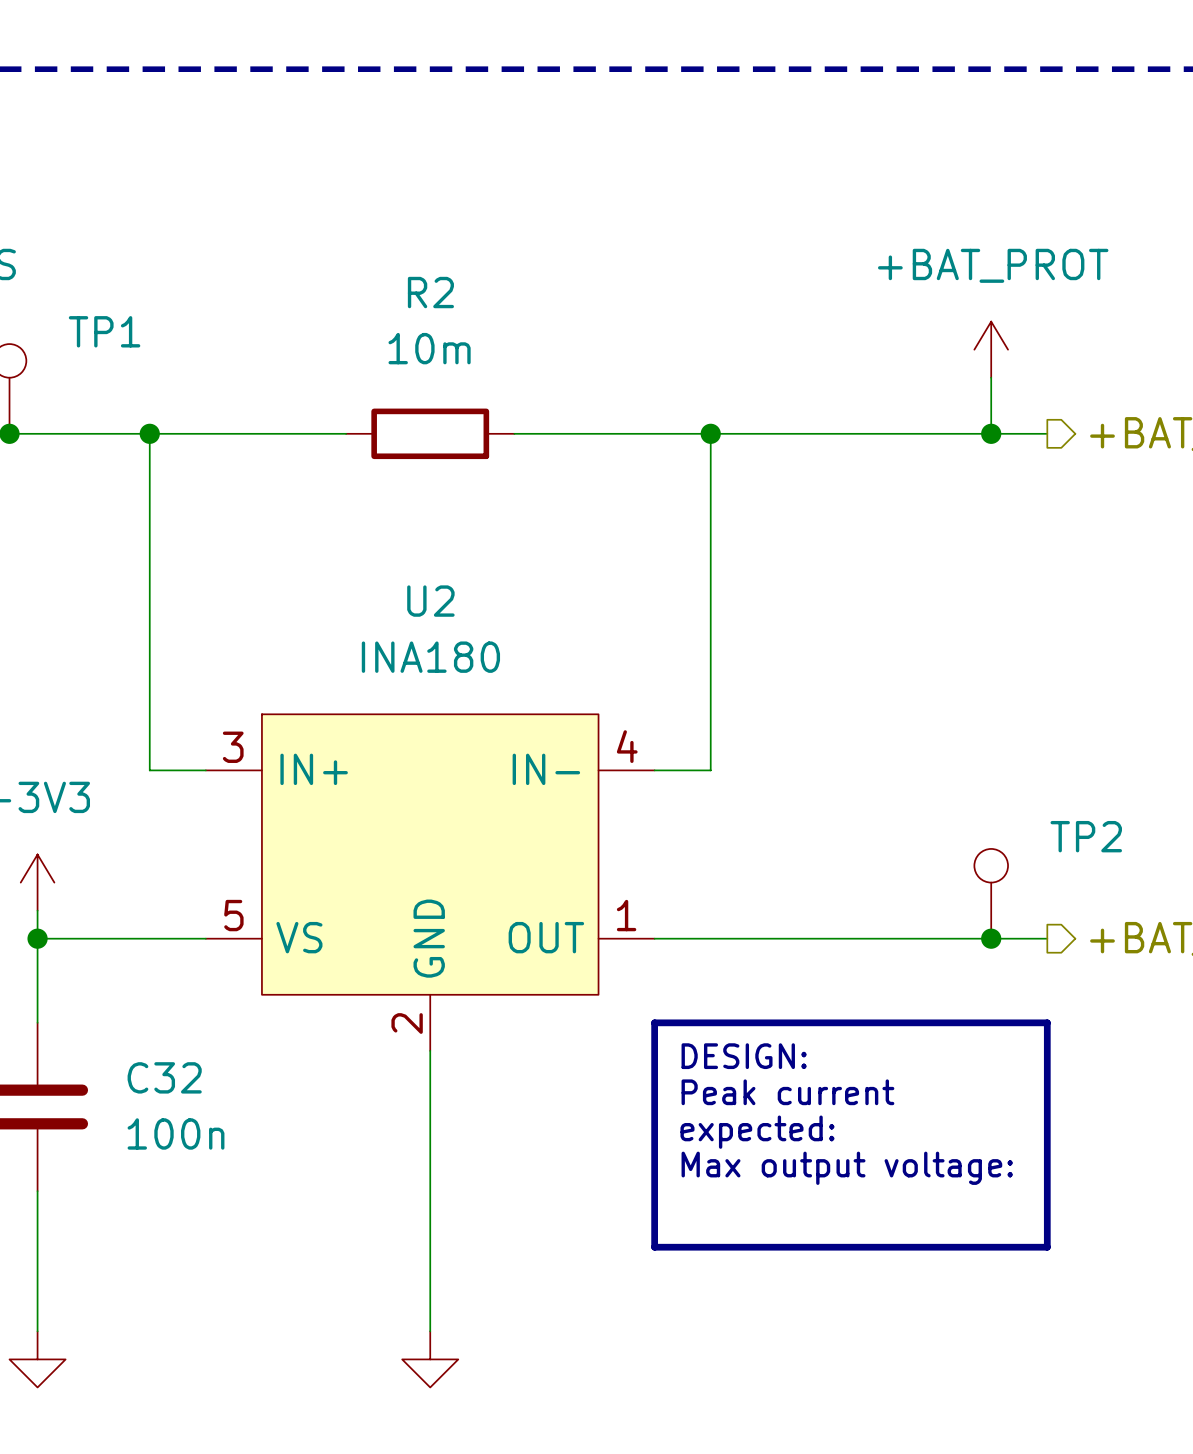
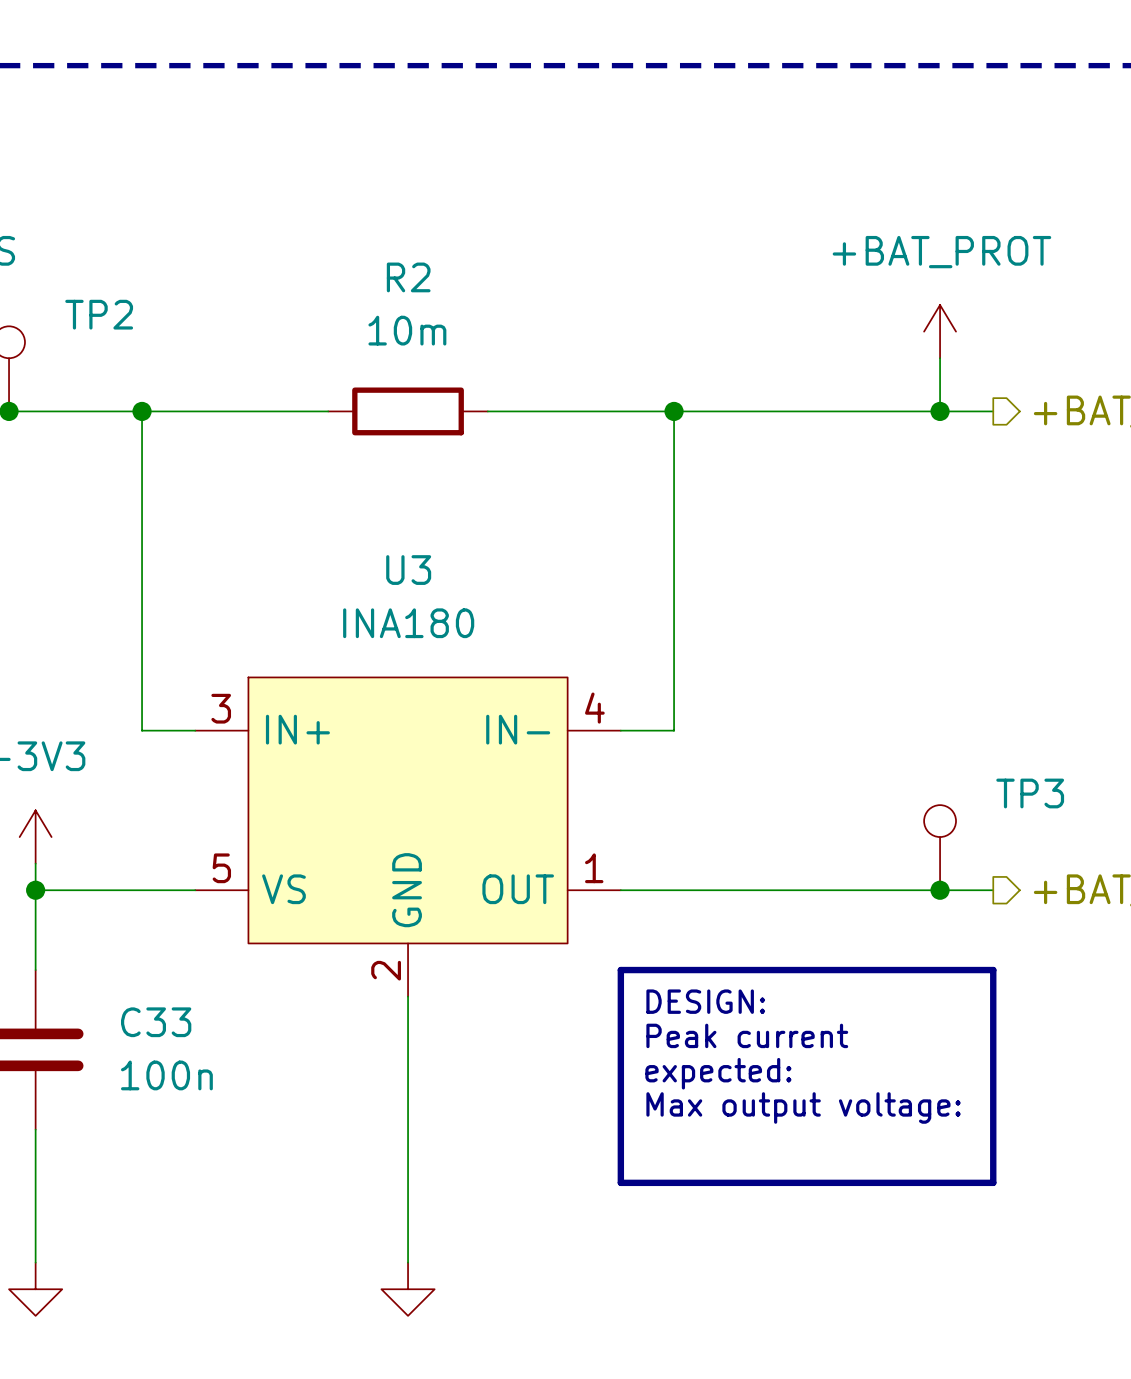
TP1 name: TP1 (104, 331) -> TP2 (99, 314)
U2 name: U2 (430, 601) -> U3 (408, 570)
TP2 name: TP2 (1086, 836) -> TP3 (1030, 793)
C32 name: C32 (164, 1077) -> C33 (156, 1022)

